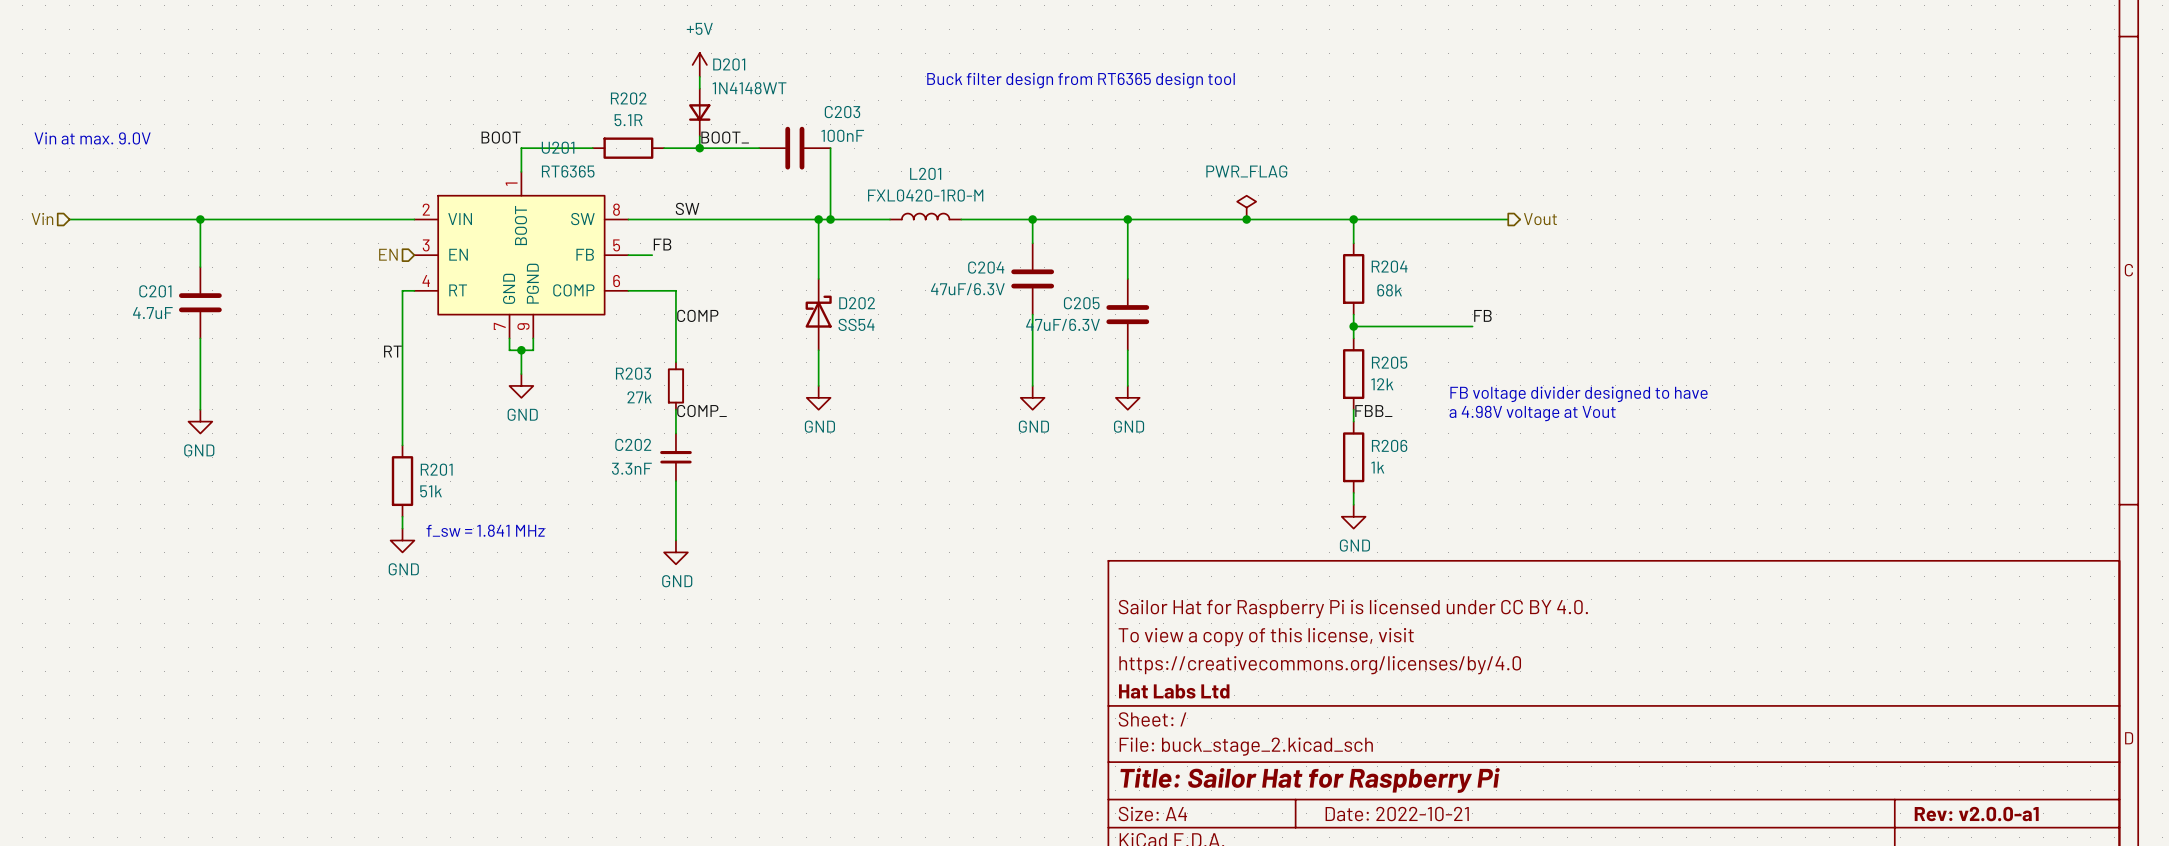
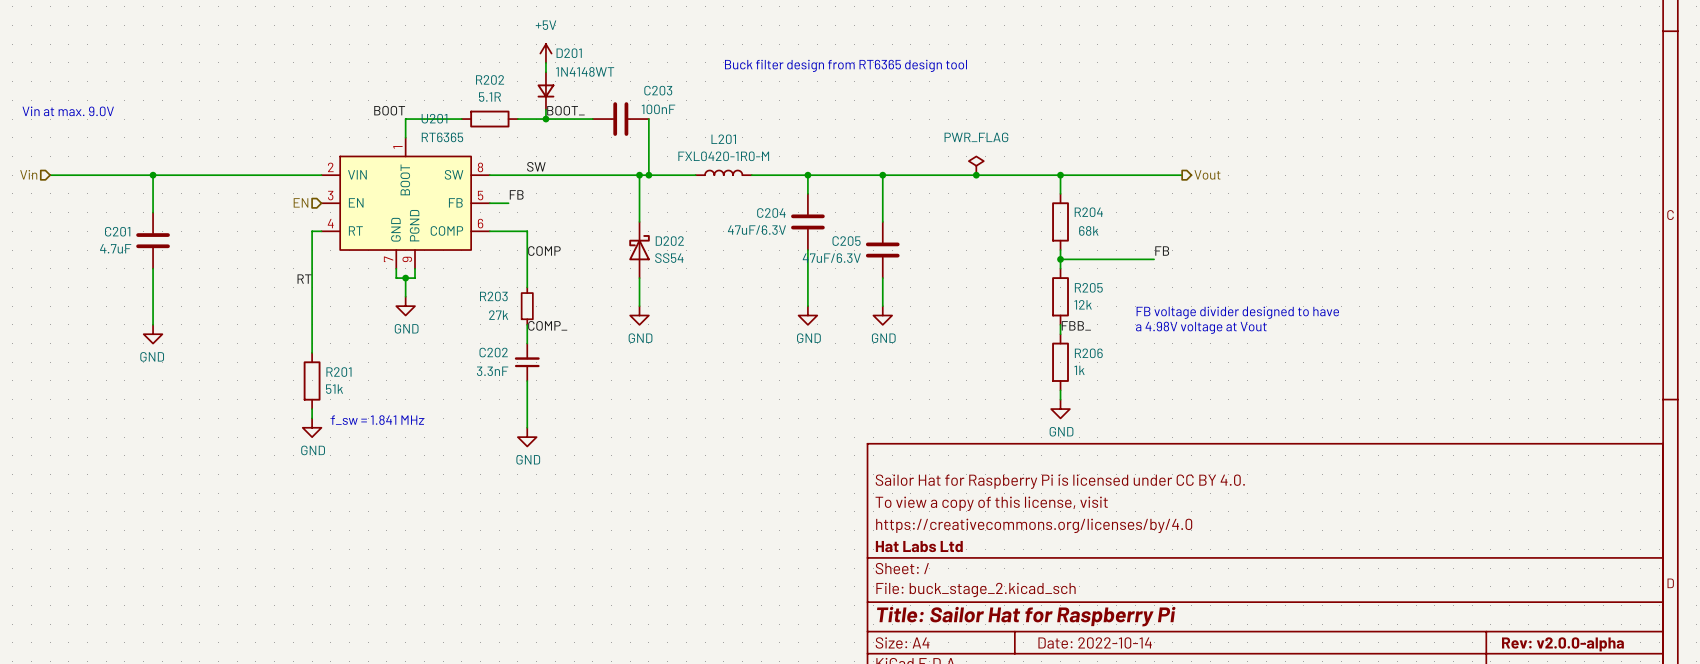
title block: Date: 2022-10-21 (1397, 814) -> Date: 2022-10-14 (1095, 642)
title block: Rev: v2.0.0-a1 (1976, 814) -> Rev: v2.0.0-alpha (1562, 644)

